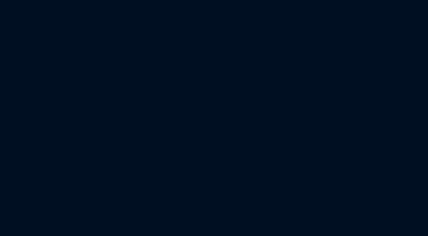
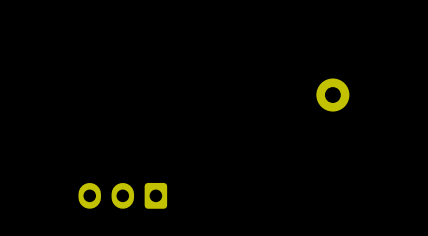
part: none -> (332, 95)
part: none -> (122, 195)

